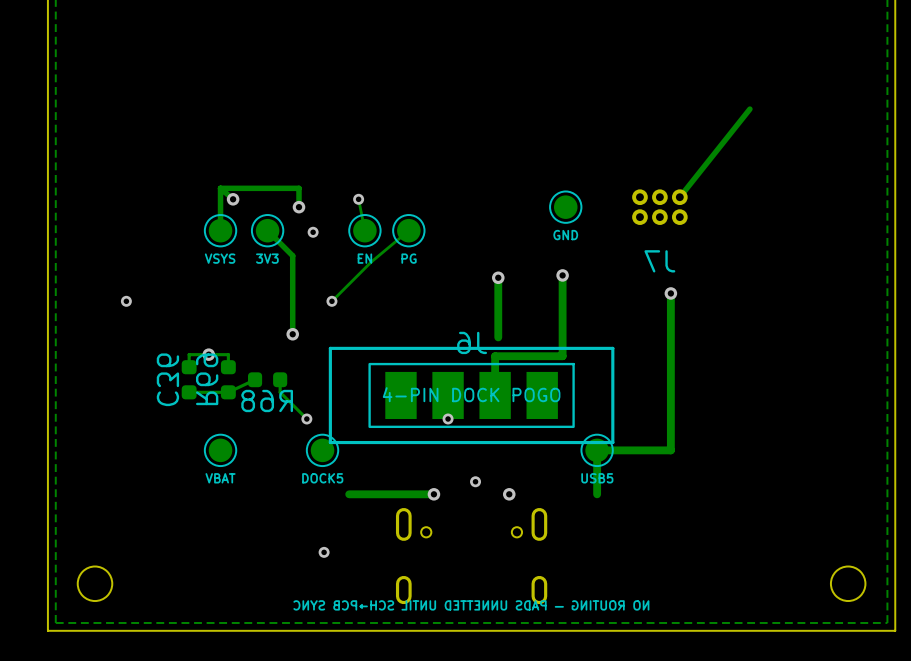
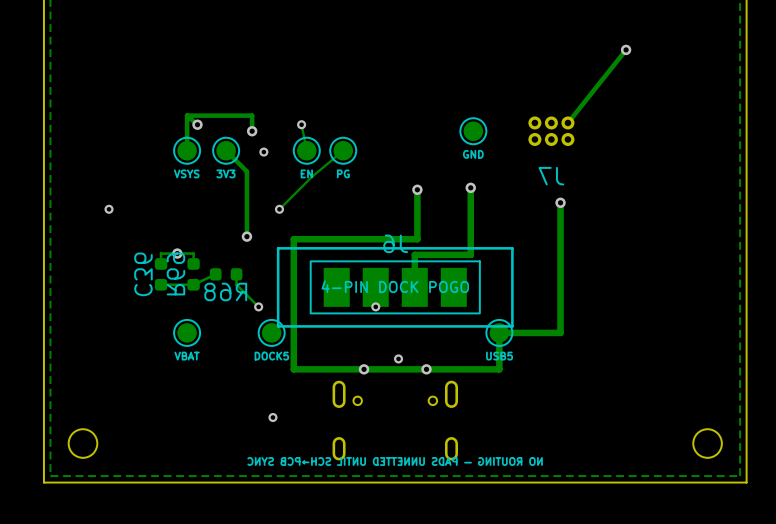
via: none -> (626, 49)
track: none -> (417, 239) (293, 239) (293, 369)
track: none -> (499, 369) (364, 369)

